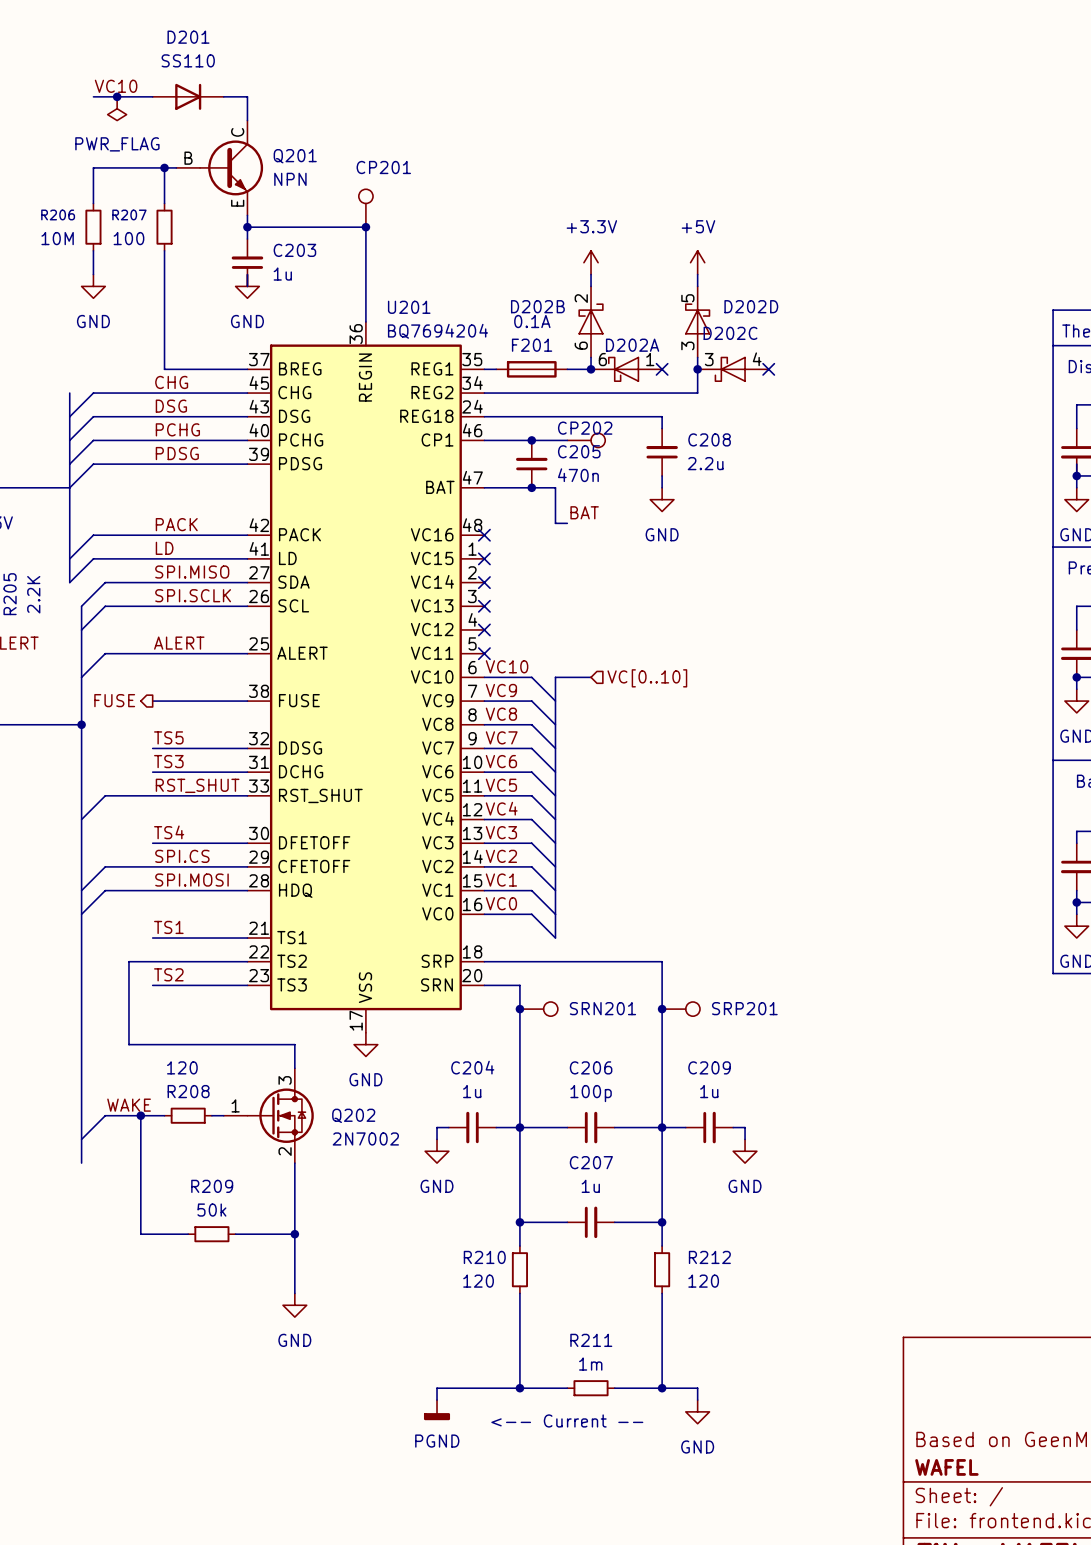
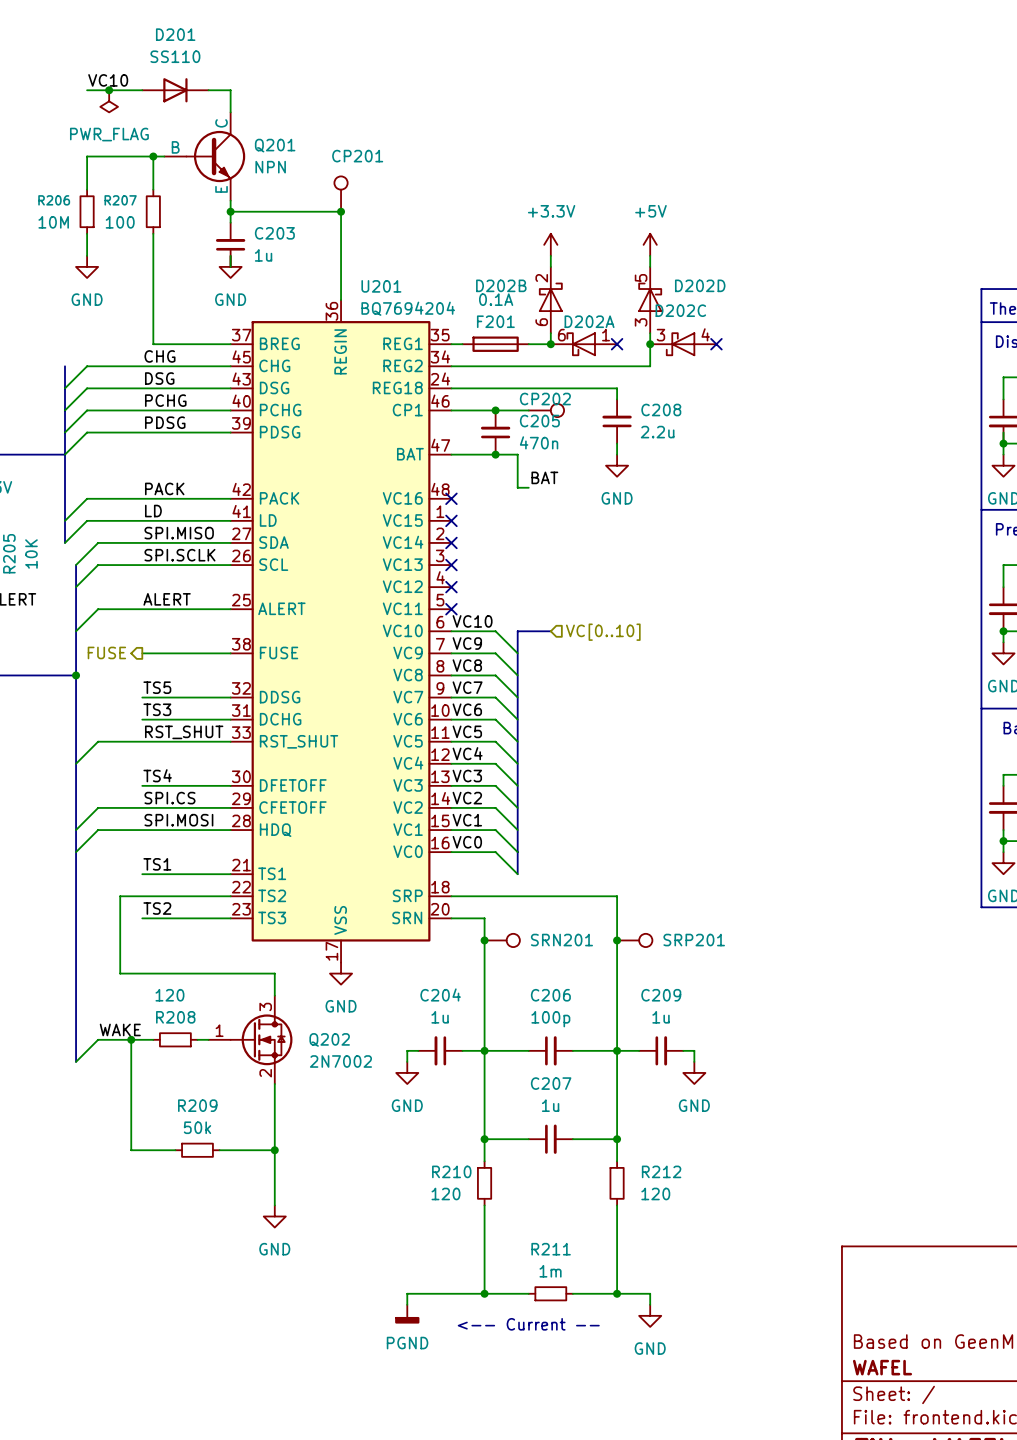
R205 value: 2.2K (33, 594) -> 10K (31, 554)
bus: (81, 1139) (81, 1163) -> none

